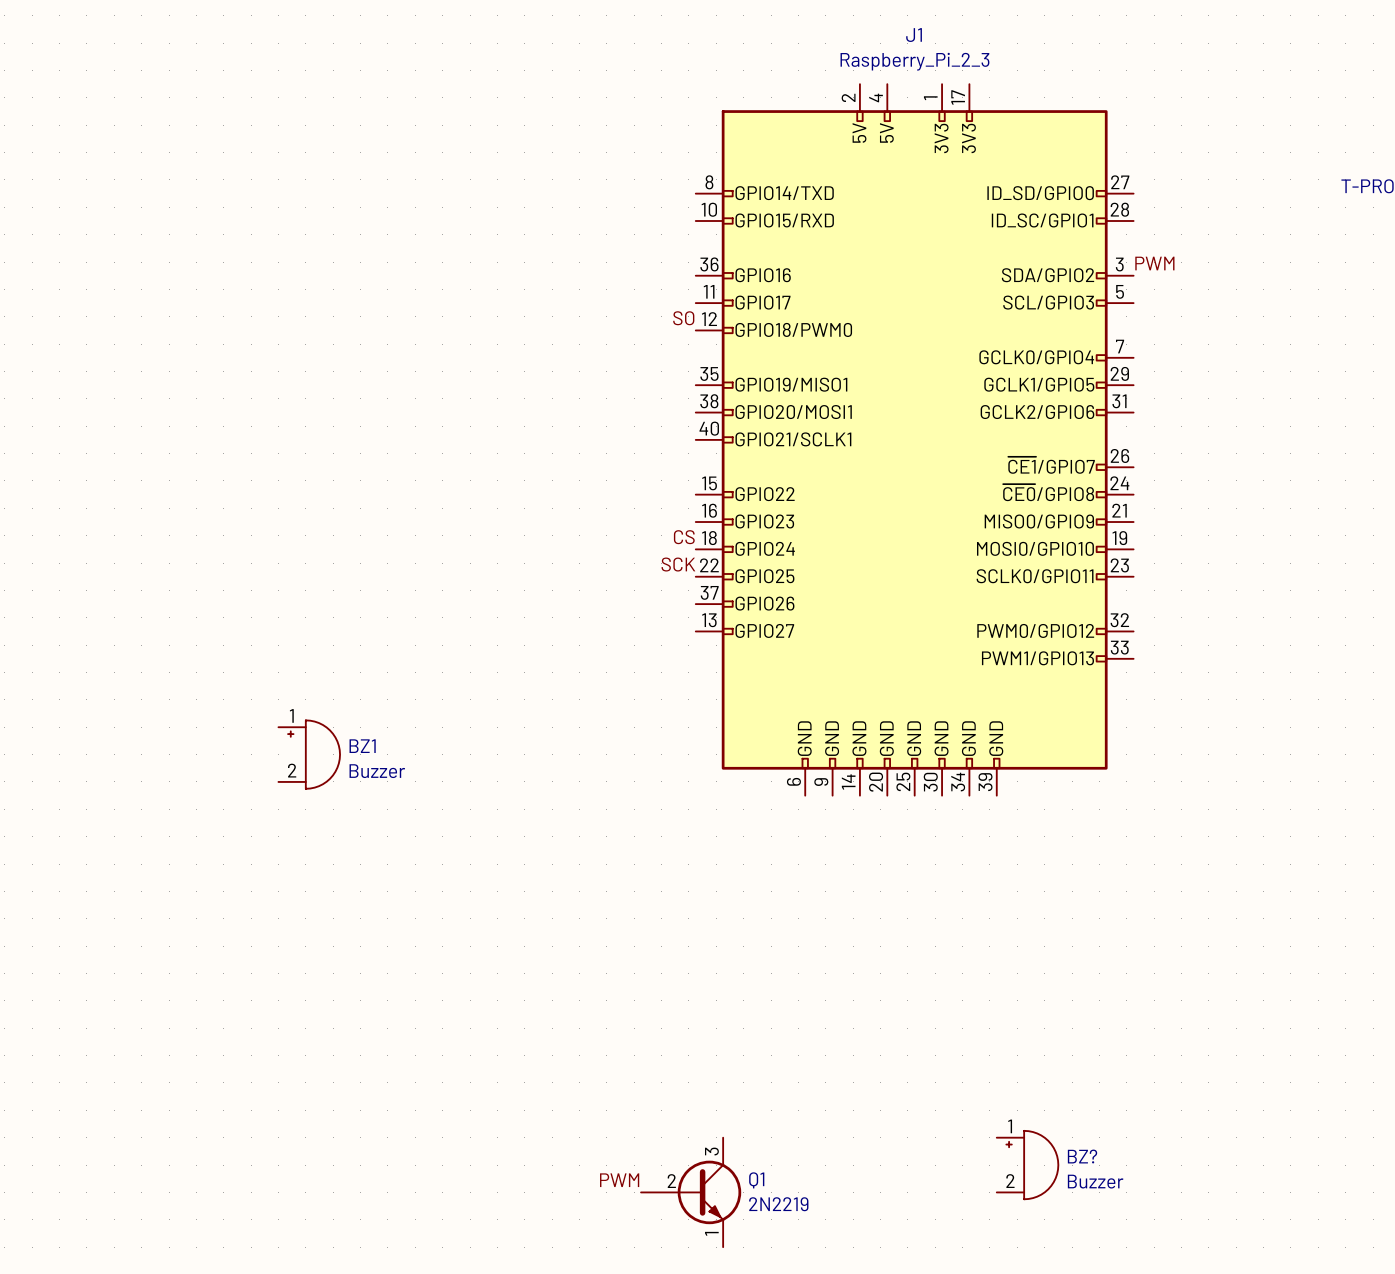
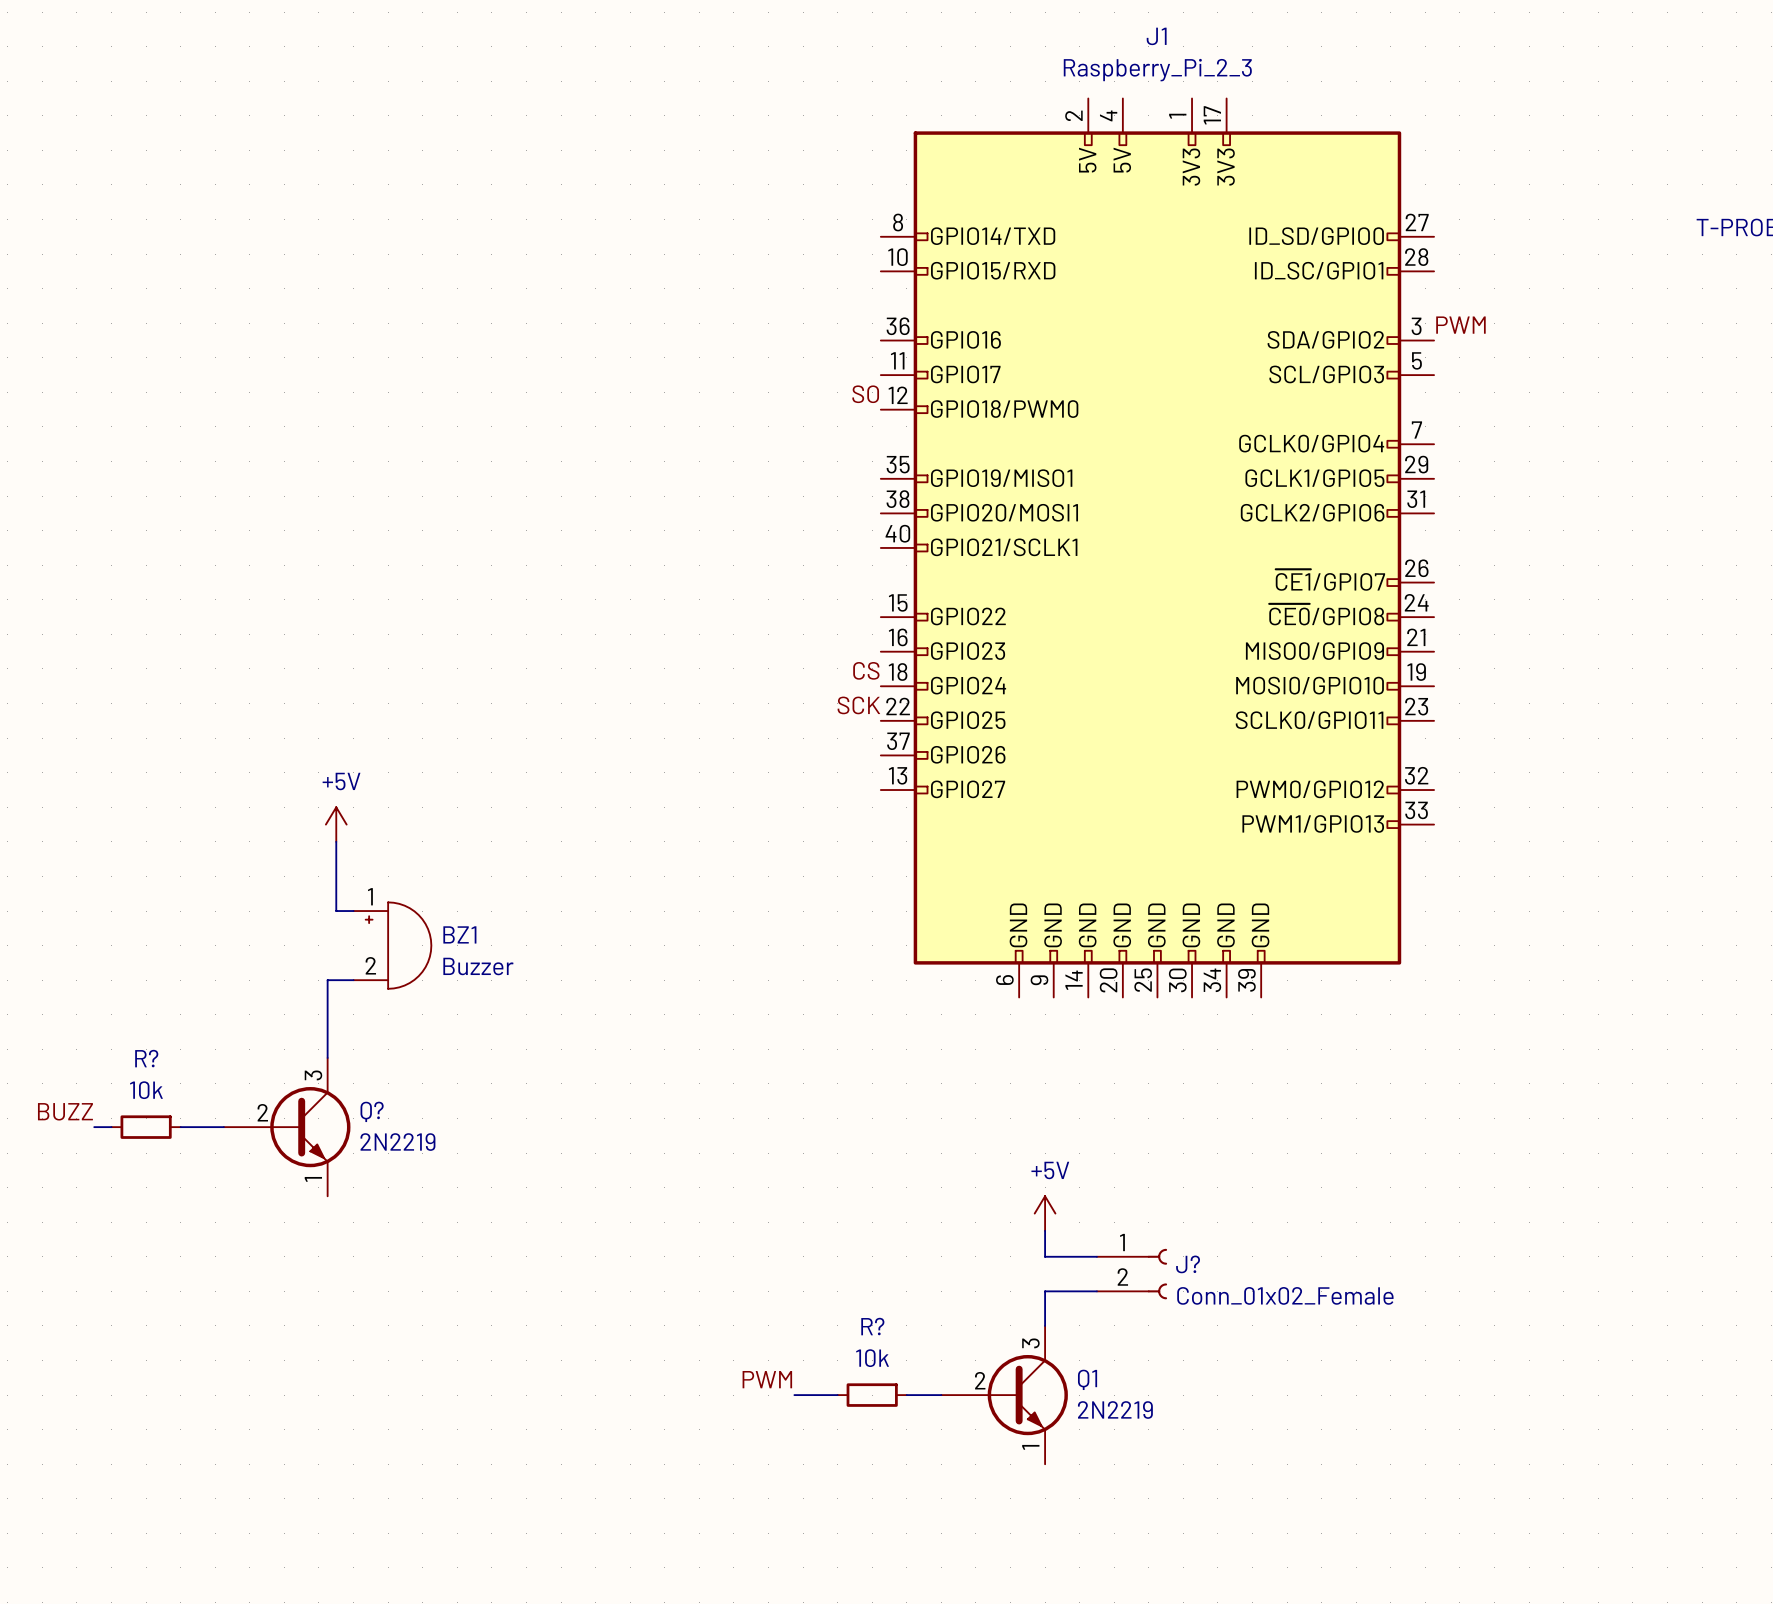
power symbol: none -> +5V (336, 824)
wire: none -> (336, 841) (336, 911) (353, 911)
wire: none -> (353, 980) (327, 980) (327, 1057)
label: none -> BUZZ (65, 1111)
wire: none -> (94, 1127) (111, 1127)
R?: none -> 10k (146, 1127)
wire: none -> (180, 1127) (223, 1127)
Q?: none -> 2N2219 (287, 1127)
power symbol: none -> +5V (1045, 1213)
wire: none -> (1045, 1230) (1045, 1256) (1096, 1256)
J?: none -> Conn_01x02_Female (1132, 1274)
wire: none -> (1096, 1291) (1045, 1291) (1045, 1325)
wire: none -> (794, 1395) (837, 1395)
R?: none -> 10k (872, 1395)
wire: none -> (906, 1395) (941, 1395)
BZ?: Buzzer (1027, 1165) -> none
label position: PWM (619, 1180) -> PWM (767, 1379)
Q1 position: (691, 1192) -> (1004, 1395)

